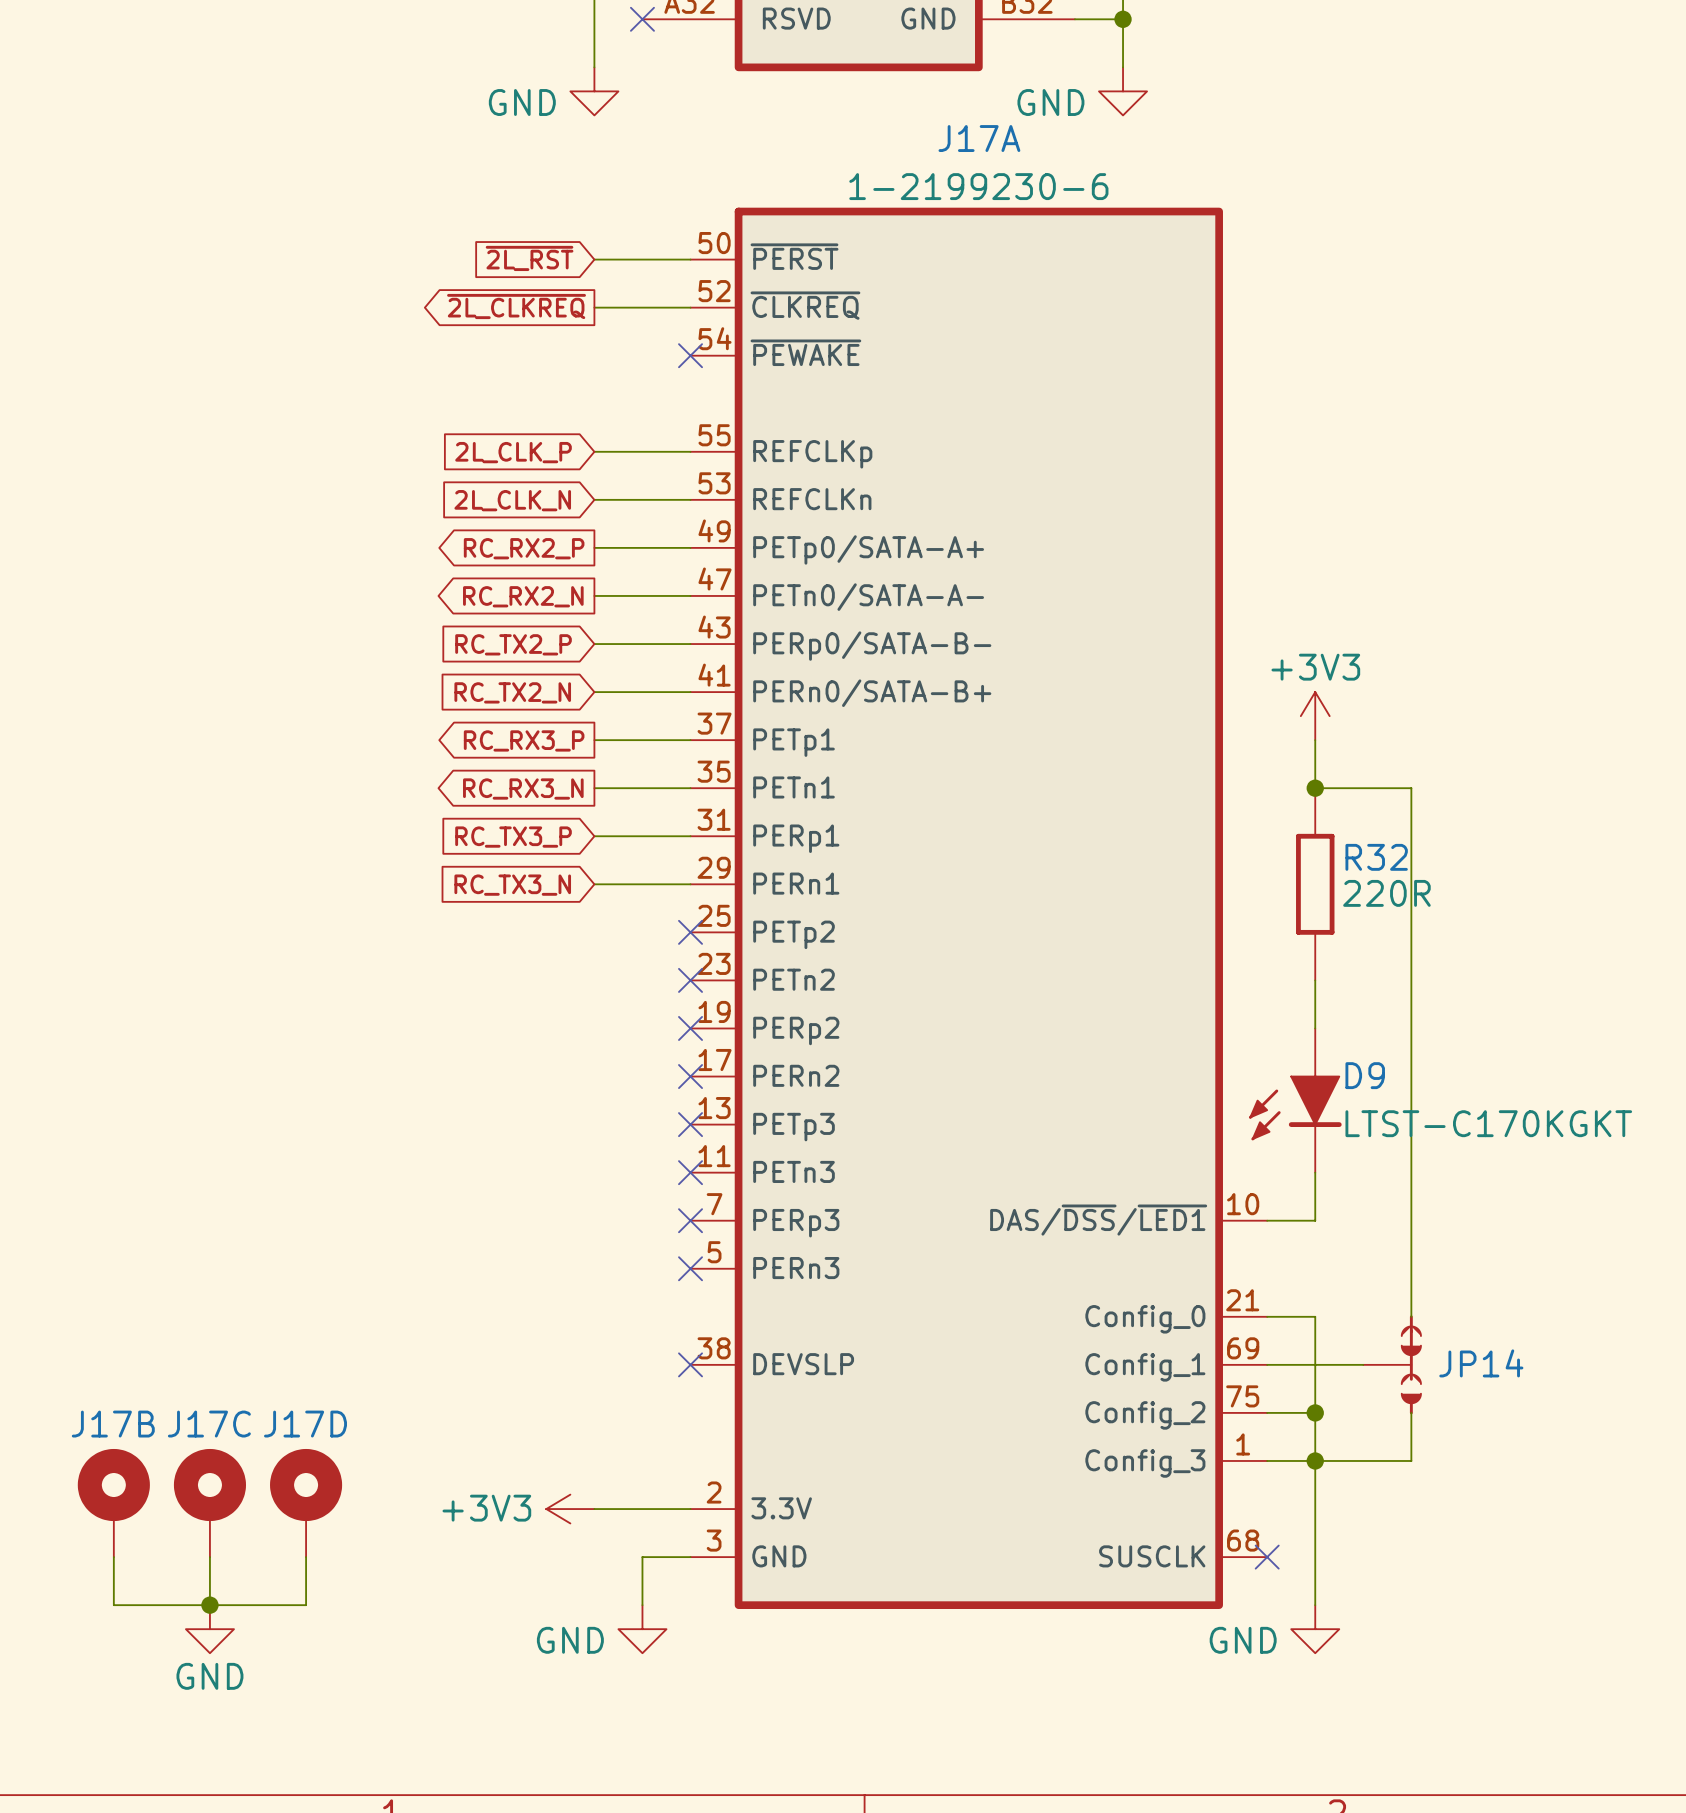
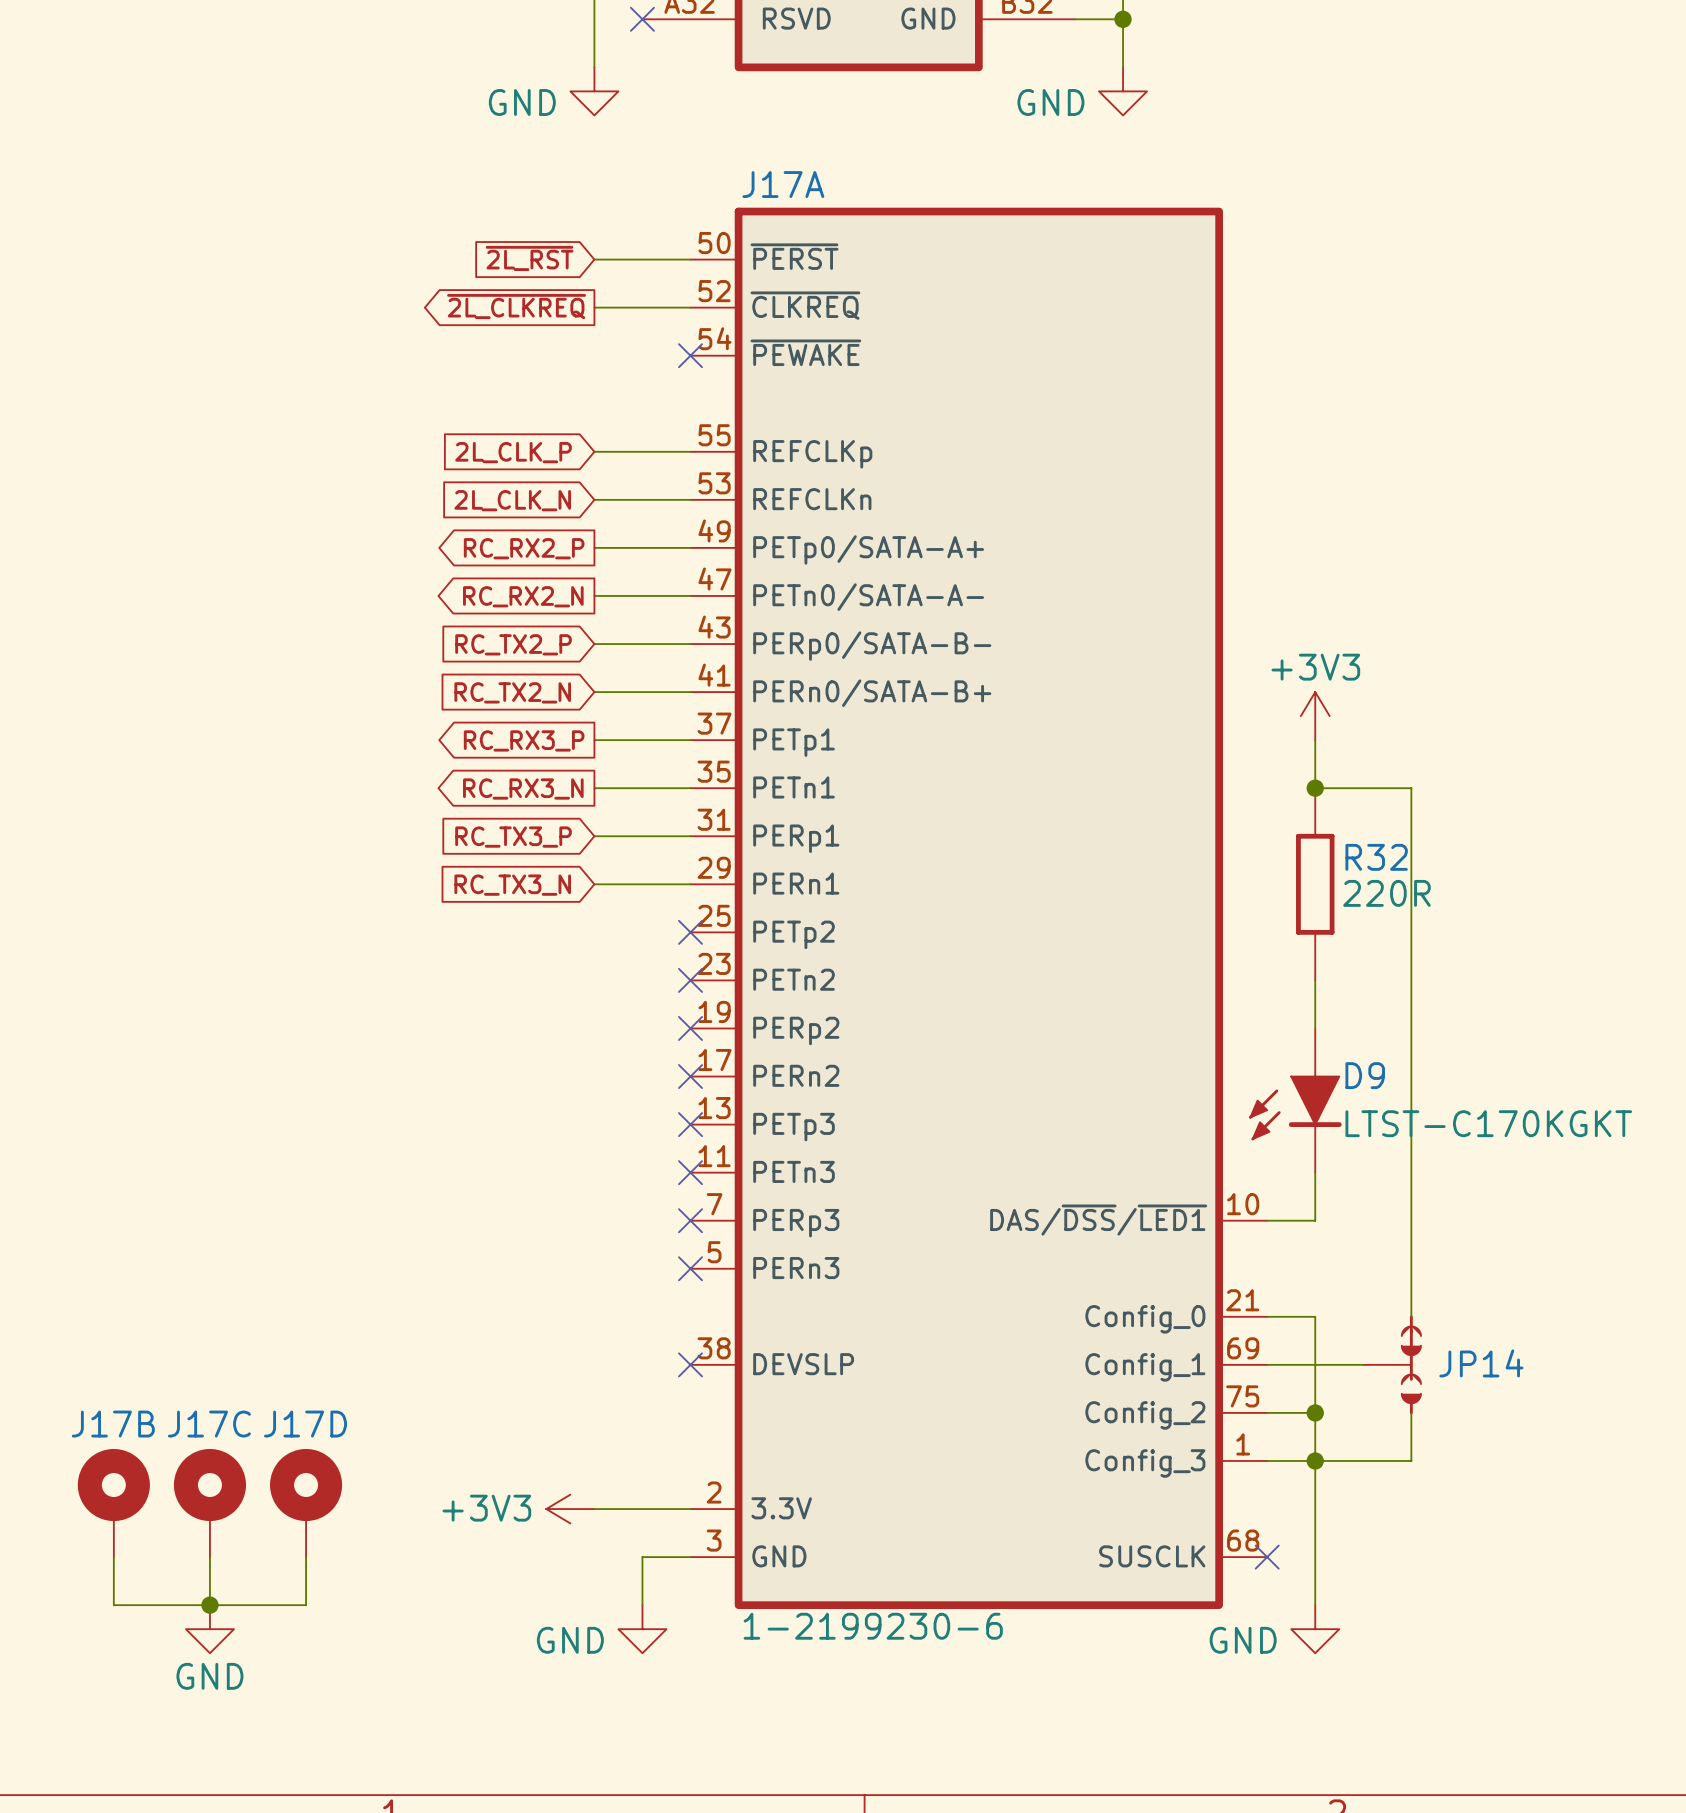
J17A name position: J17A (979, 138) -> J17A (783, 184)
J17A value position: 1-2199230-6 (978, 186) -> 1-2199230-6 (873, 1626)

